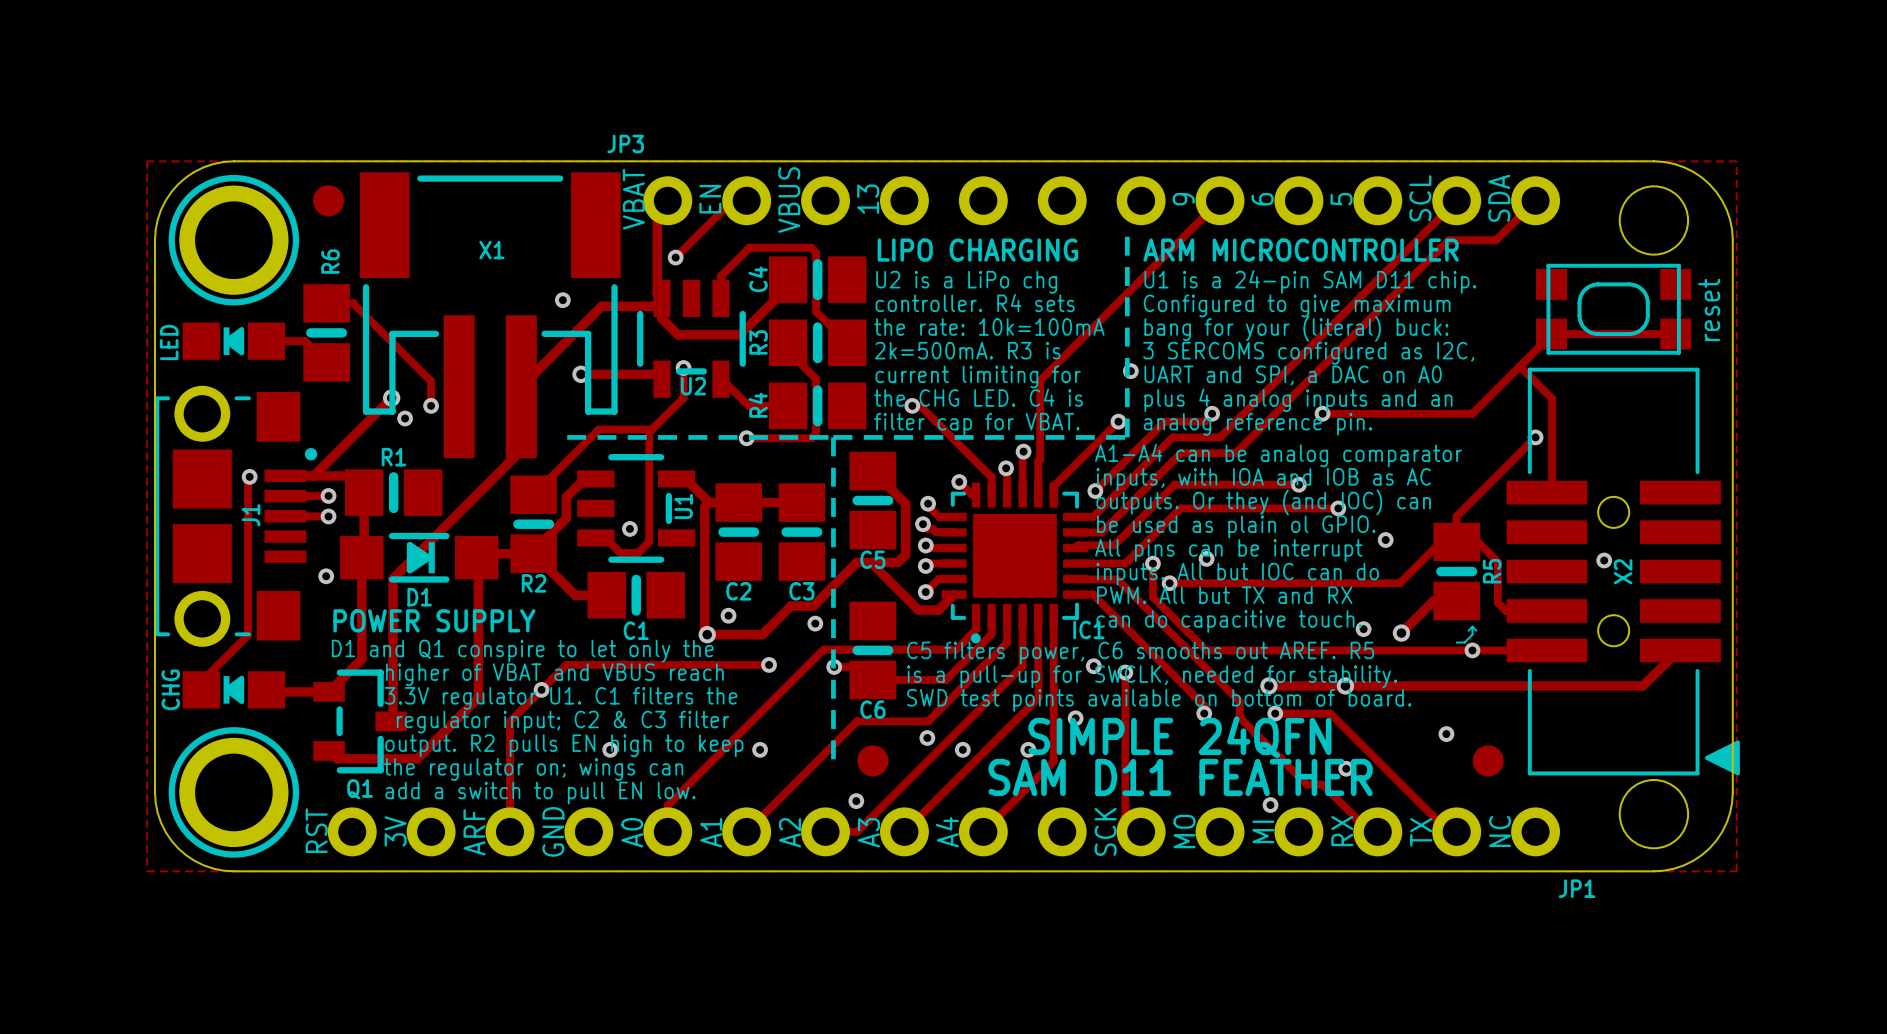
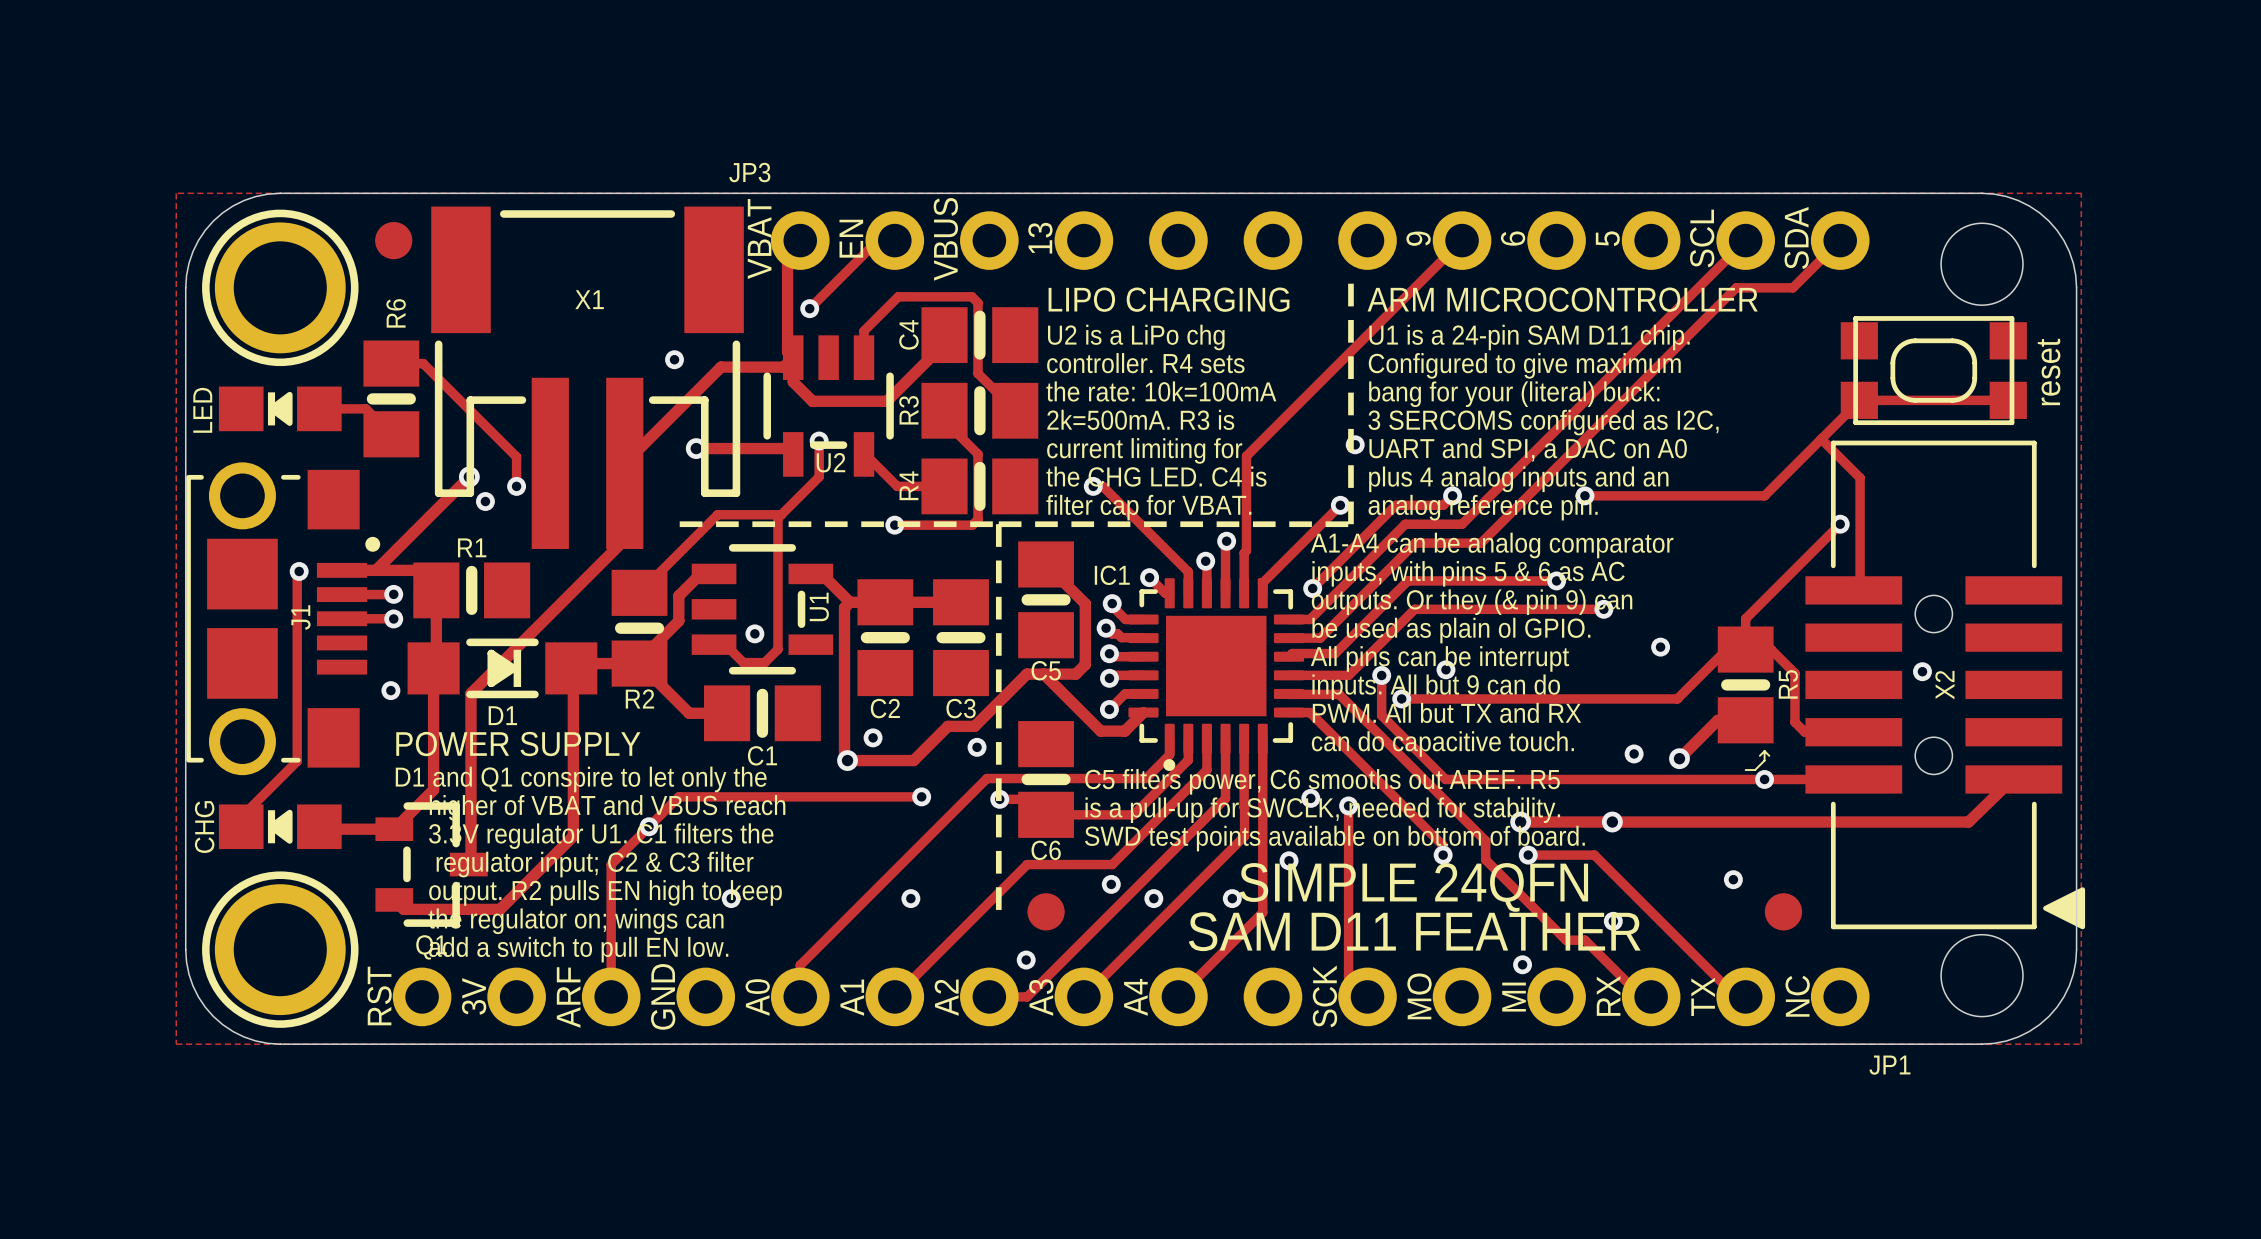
text: inputs, with IOA and IOB as AC (1263, 479) -> inputs, with pins 5 & 6 as AC (1468, 573)
text: outputs. Or they (and IOC) can (1263, 502) -> outputs. Or they (& pin 9) can (1472, 602)
text: inputs. All but IOC can do (1237, 574) -> inputs. All but 9 can do (1436, 687)
IC1 name position: IC1 (1088, 629) -> IC1 (1112, 575)

